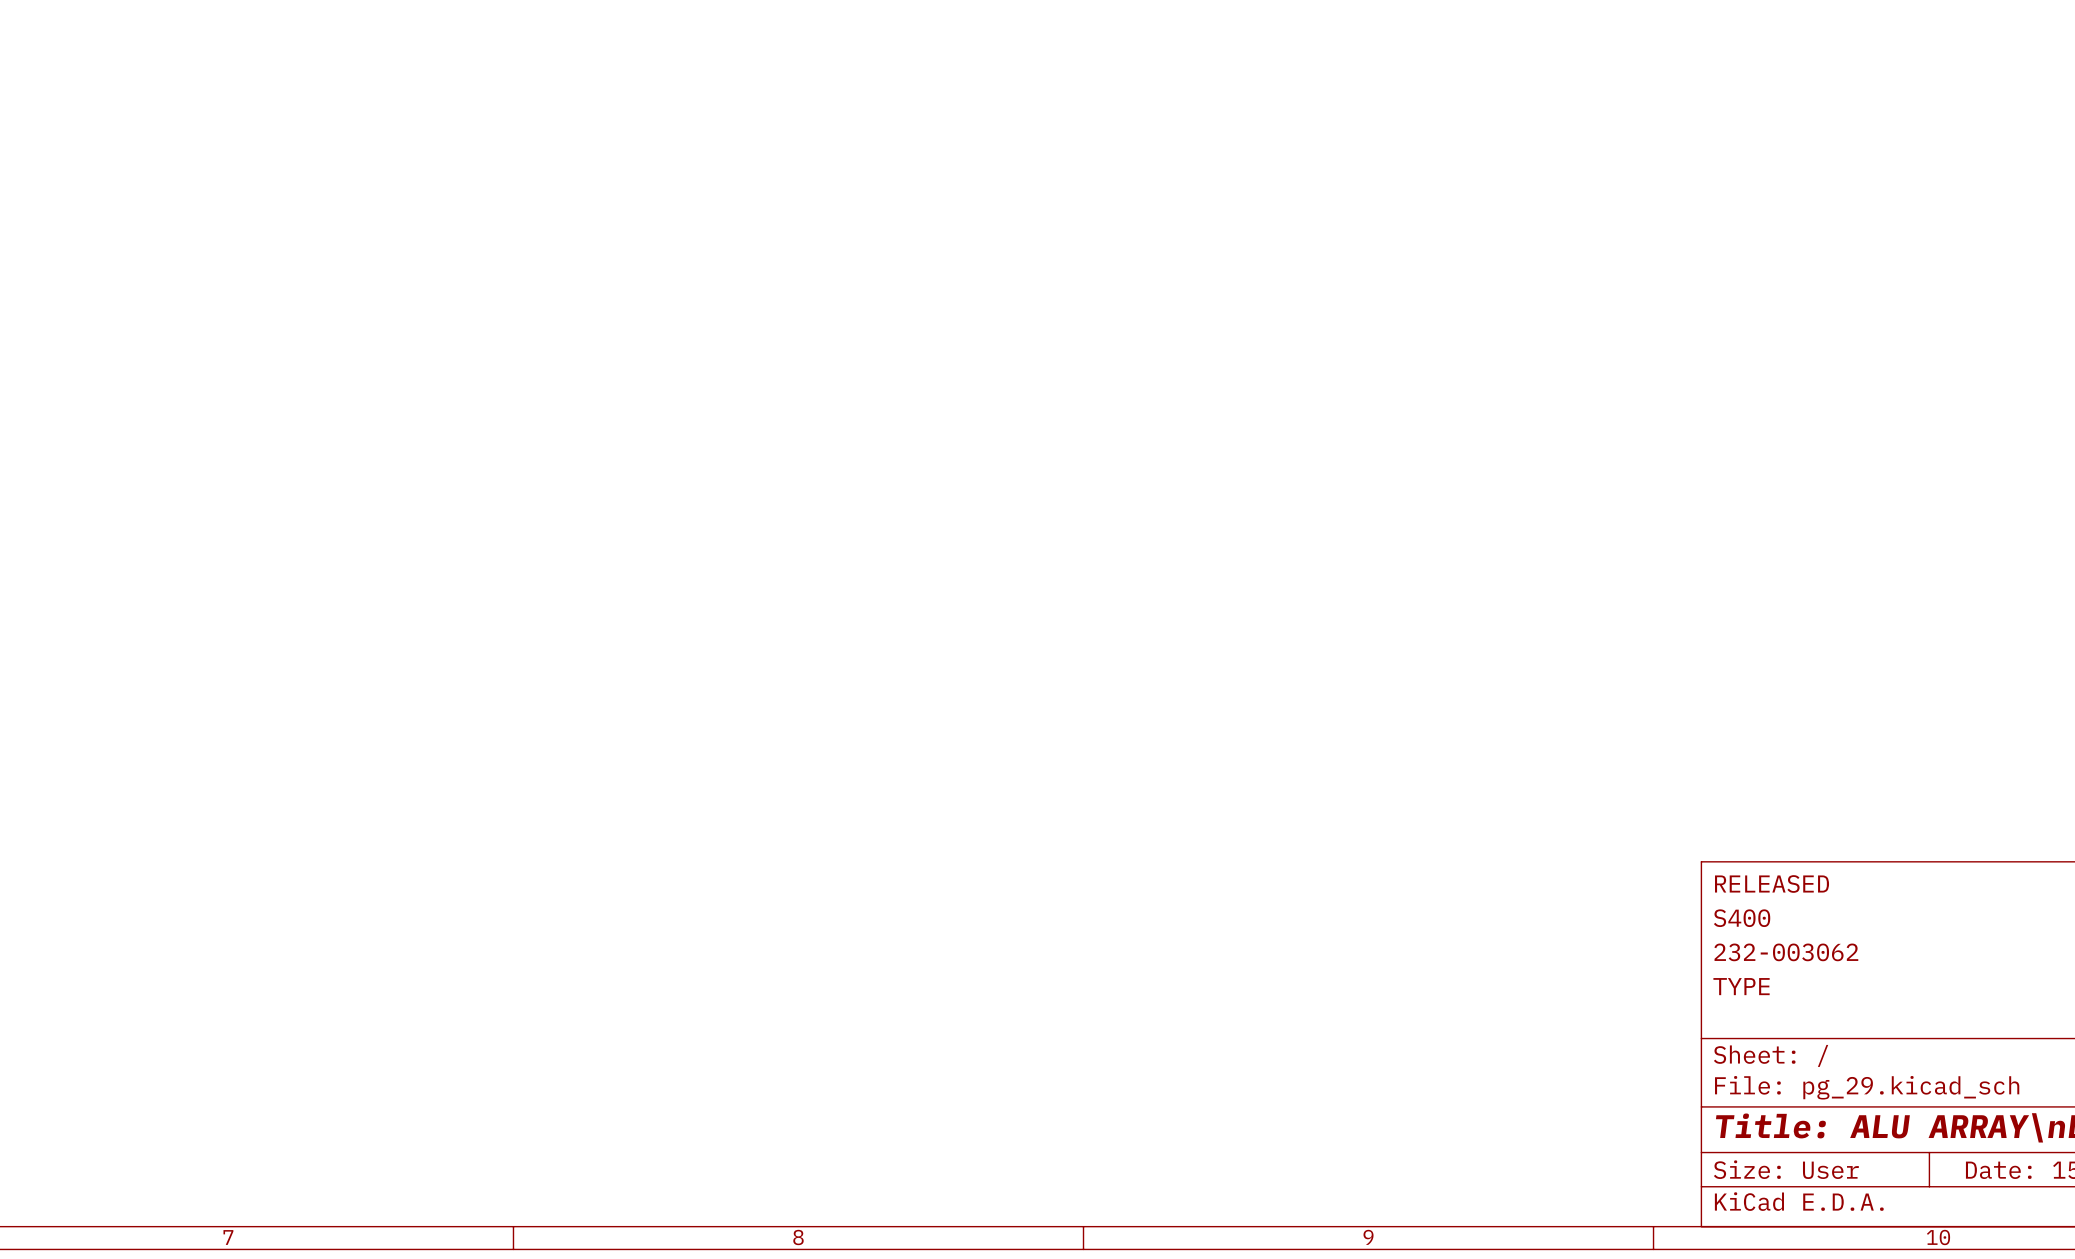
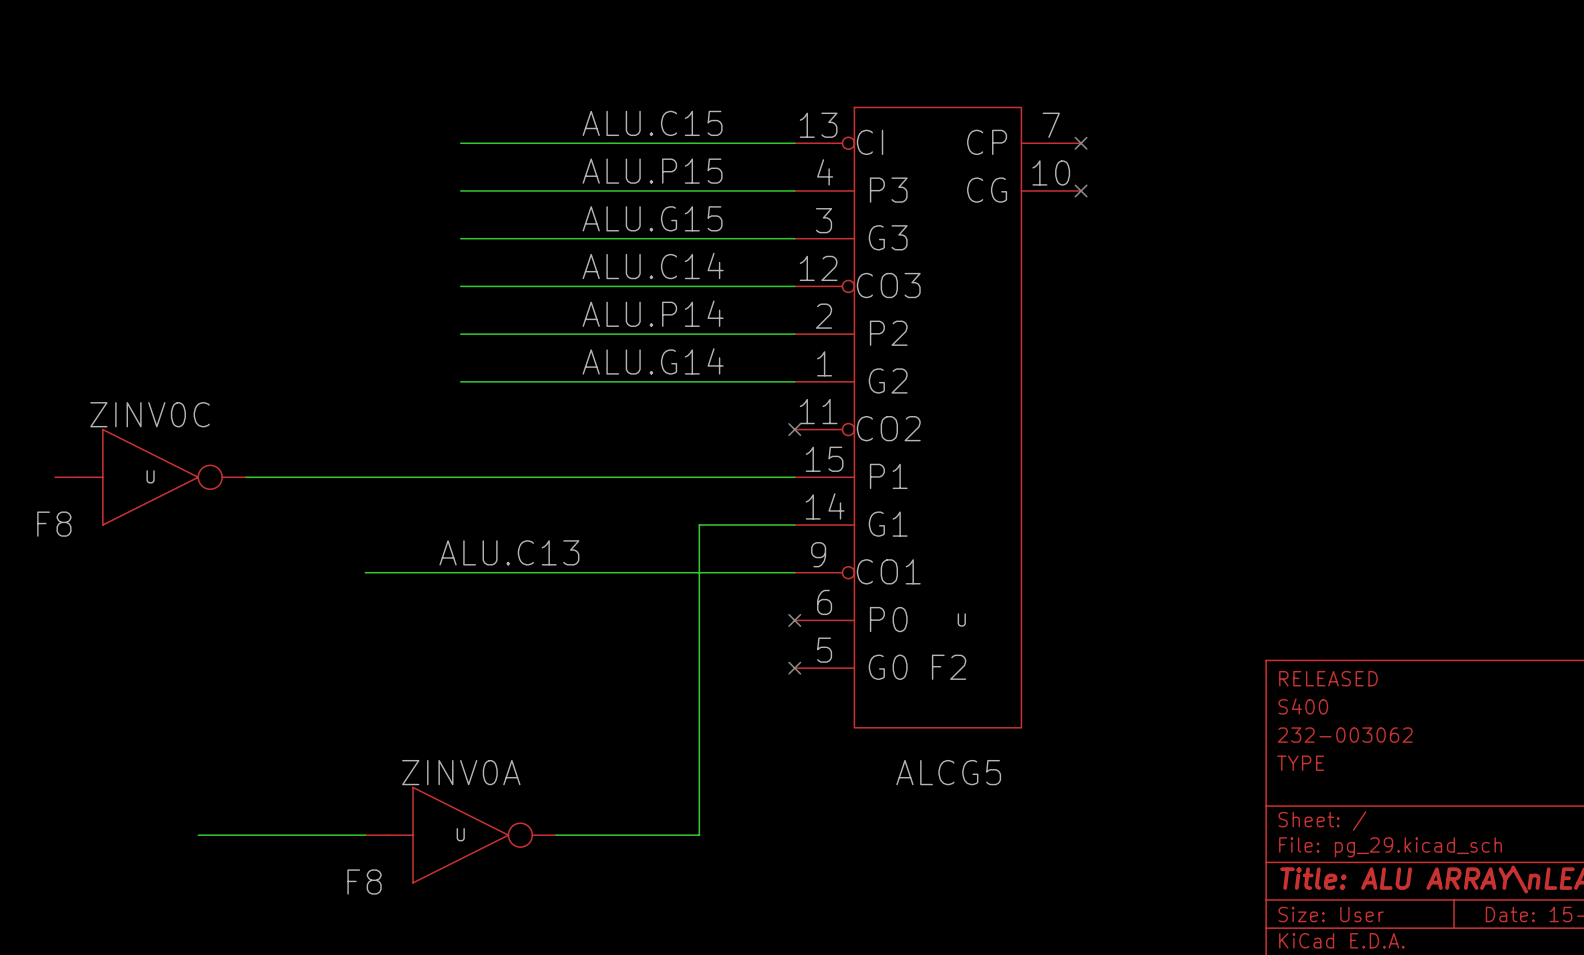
label: none -> ALU.C15 (652, 123)
wire: none -> (460, 143) (794, 143)
no-connect mark: none -> (1081, 143)
label: none -> ALU.P15 (652, 171)
wire: none -> (460, 190) (794, 190)
no-connect mark: none -> (1081, 190)
label: none -> ALU.G15 (652, 218)
wire: none -> (460, 238) (794, 238)
label: none -> ALU.C14 (653, 265)
wire: none -> (460, 286) (794, 286)
label: none -> ALU.P14 (653, 313)
wire: none -> (460, 334) (794, 334)
label: none -> ALU.G14 (653, 361)
wire: none -> (460, 381) (794, 381)
U: none -> (937, 417)
no-connect mark: none -> (794, 429)
U: none -> (150, 477)
wire: none -> (246, 477) (794, 477)
wire: none -> (794, 525) (699, 525) (699, 835) (556, 835)
label: none -> ALU.C13 (509, 552)
wire: none -> (365, 572) (794, 572)
no-connect mark: none -> (794, 620)
no-connect mark: none -> (794, 668)
wire: none -> (198, 835) (365, 835)
U: none -> (460, 835)

